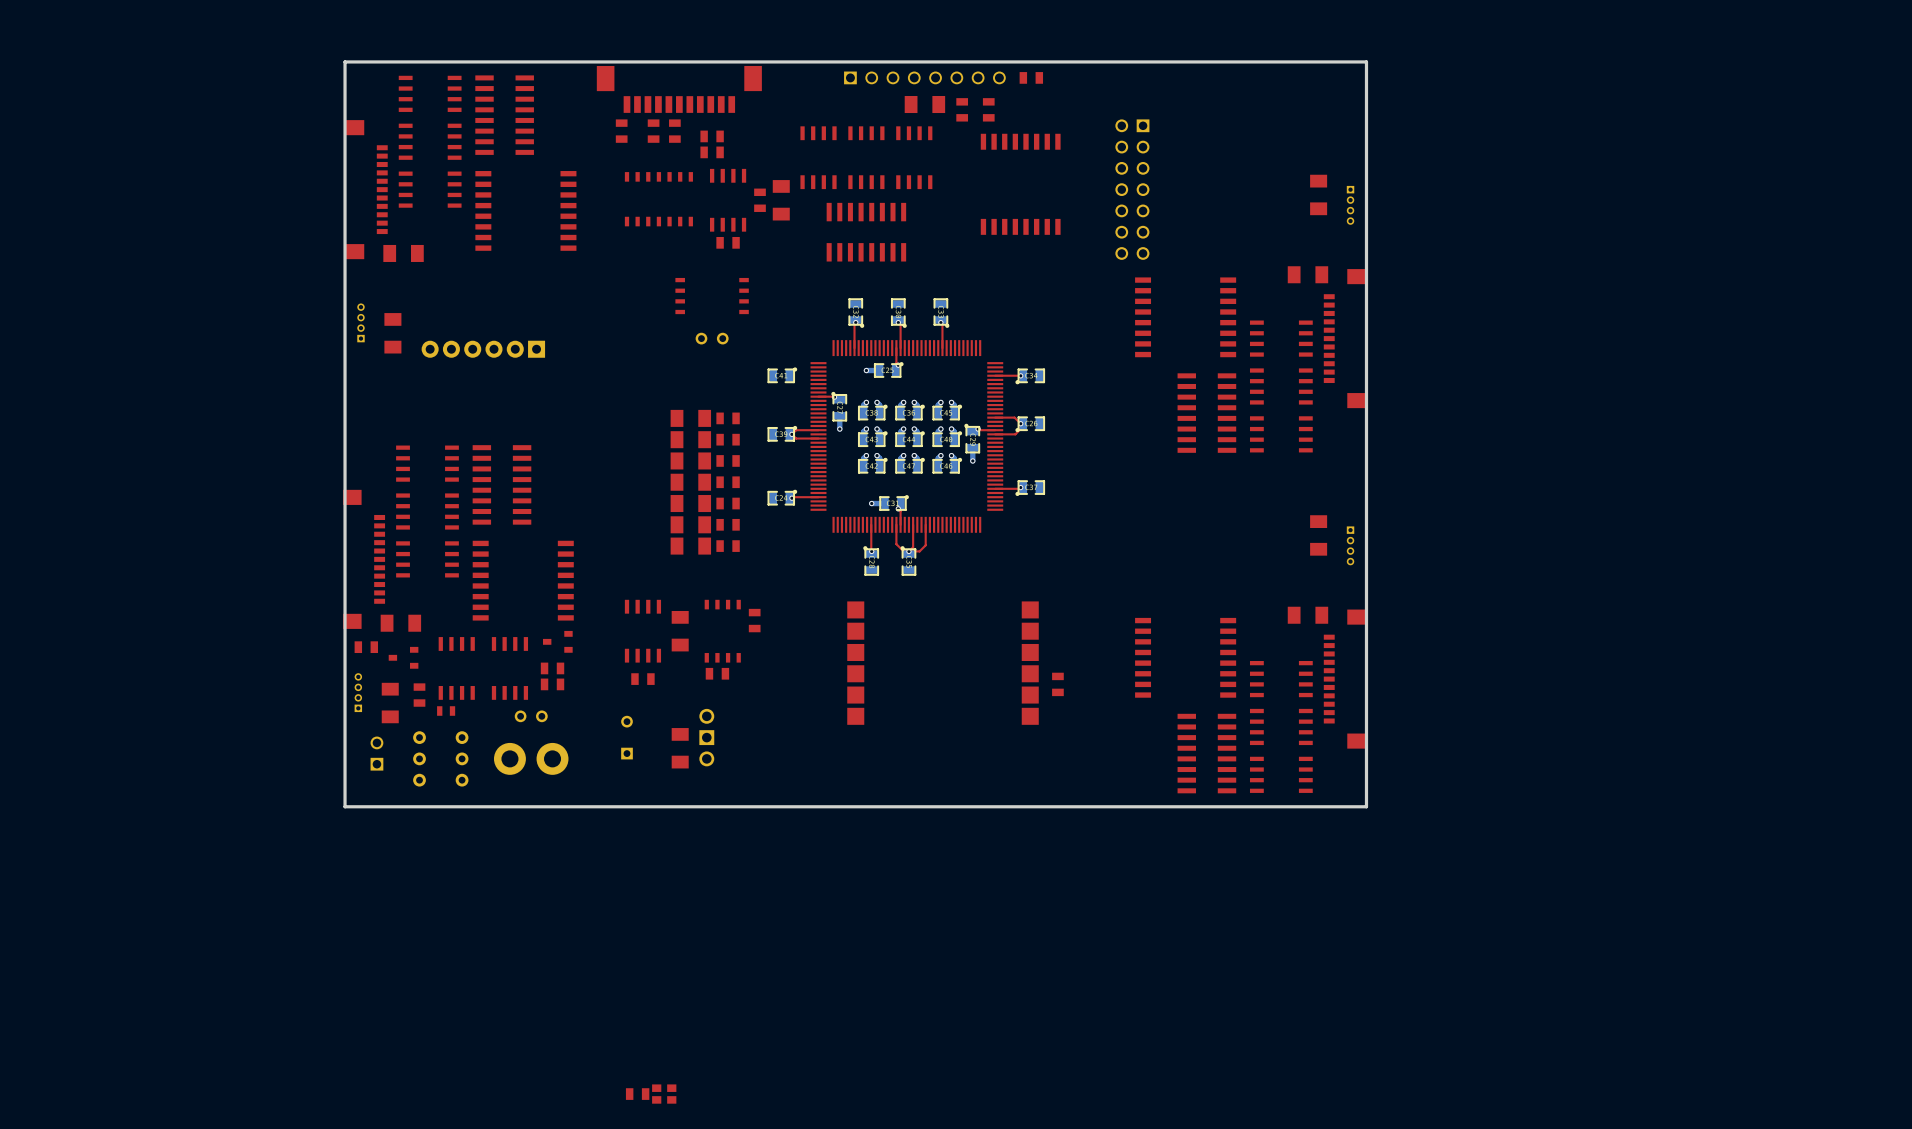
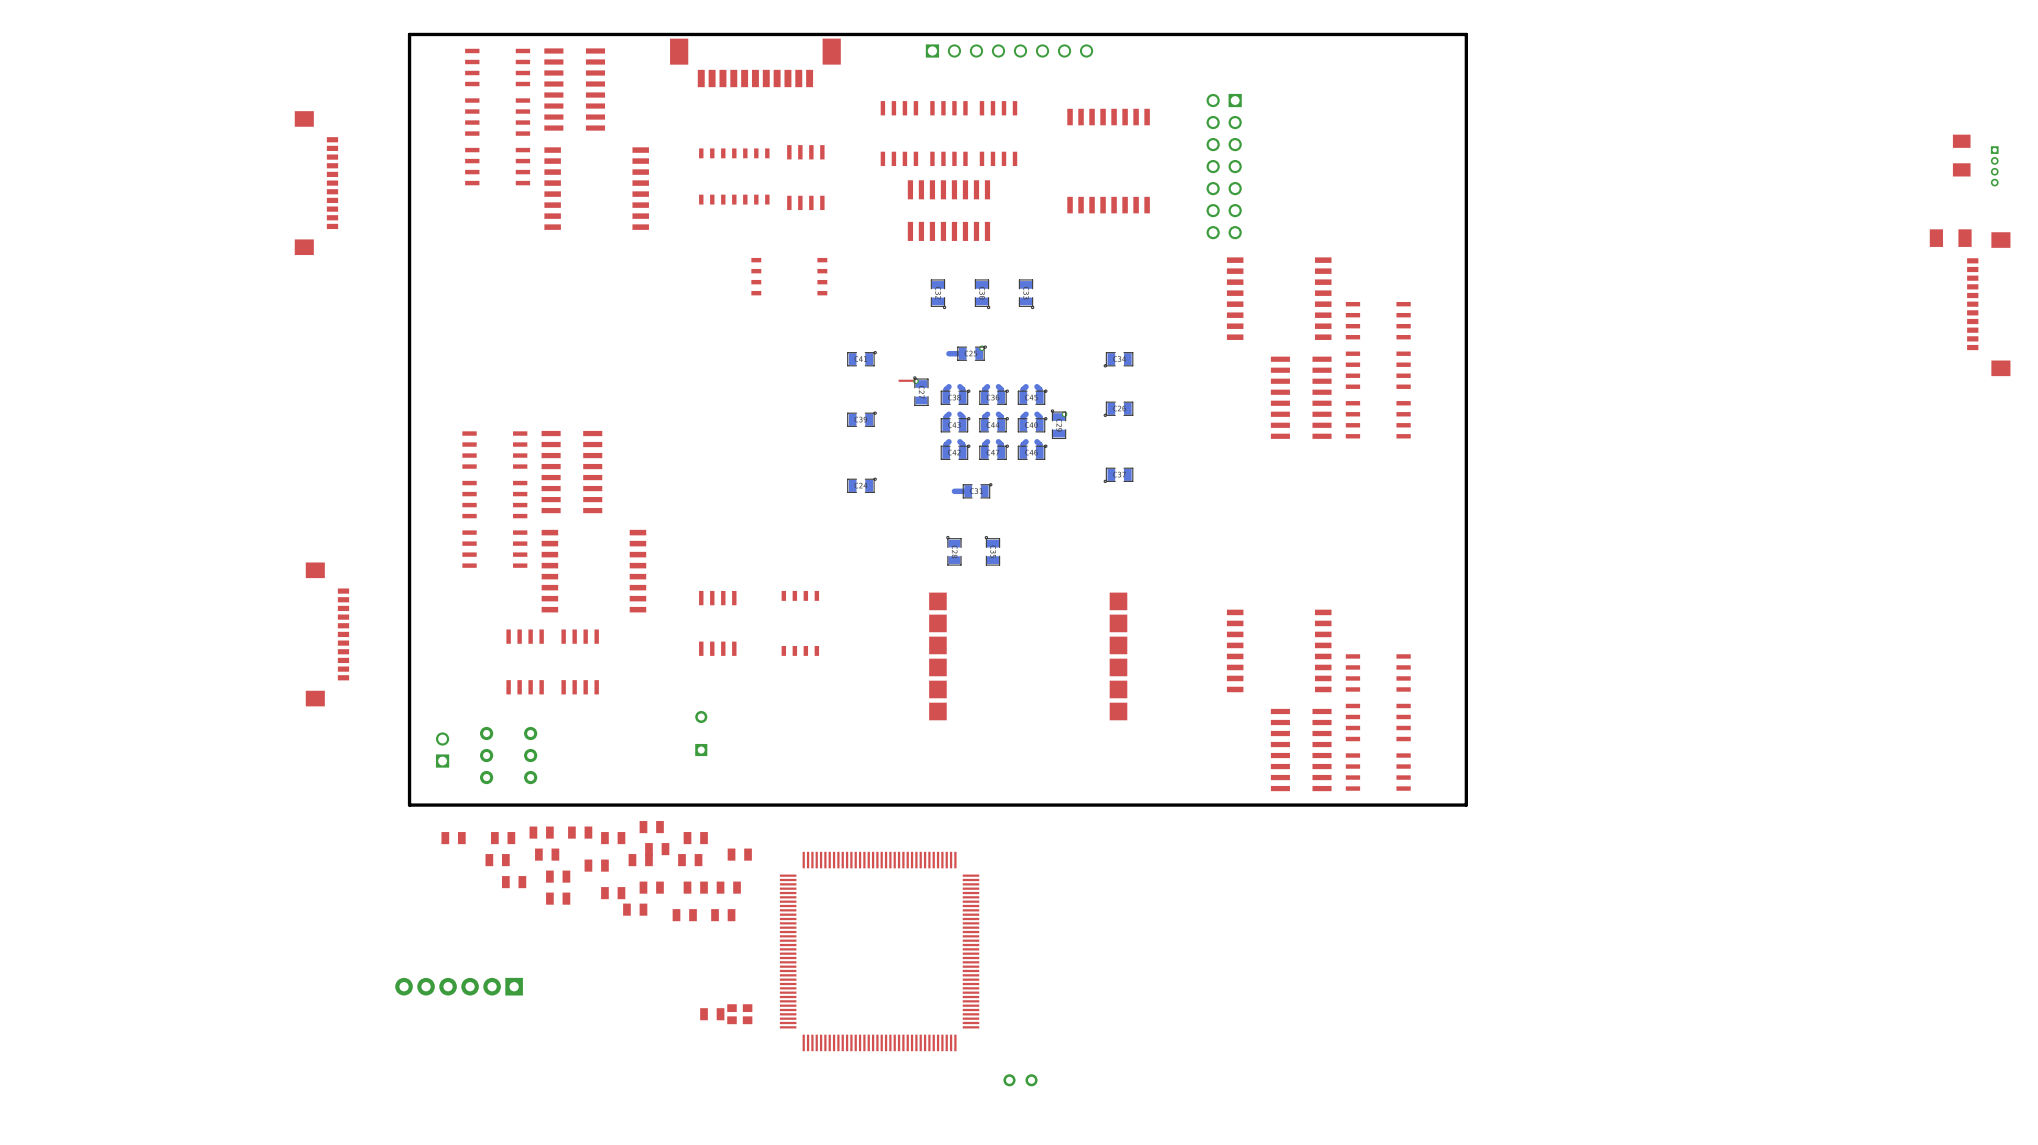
part: (1031, 77) -> none
part: (924, 104) -> none
part: (962, 109) -> none
part: (988, 109) -> none
part: (621, 131) -> none
part: (653, 131) -> none
part: (674, 131) -> none
part: (712, 136) -> none
part: (712, 152) -> none
part: none -> (1961, 155)
part position: (366, 189) -> (316, 183)
part: none -> (1994, 166)
part: (1318, 194) -> none
part: (760, 200) -> none
part: (781, 200) -> none
part: (1350, 205) -> none
part: (728, 242) -> none
part: (403, 253) -> none
part: none -> (1950, 238)
part: (1307, 274) -> none
part: (360, 322) -> none
top track: (855, 322) (854, 348) -> none
via: (855, 322) -> none
top track: (898, 322) (900, 324) (900, 348) -> none
via: (898, 322) -> none
top track: (940, 322) (942, 348) -> none
via: (940, 322) -> none
part: none -> (1988, 304)
part: (392, 333) -> none
part: (712, 338) -> none
part: (1344, 338) -> none
top track: (896, 348) (896, 363) (898, 365) -> none
part: (483, 349) -> none
via: (866, 370) -> none
top track: (1020, 375) (995, 375) -> none
via: (1020, 375) -> none
via: (866, 402) -> none
via: (877, 402) -> none
via: (903, 402) -> none
via: (914, 402) -> none
via: (940, 402) -> none
via: (951, 402) -> none
bottom track: (839, 415) (839, 429) -> none
top track: (995, 417) (1014, 417) (1020, 423) (1020, 429) (1015, 434) (995, 434) -> none
part: (690, 418) -> none
part: (728, 418) -> none
via: (1020, 423) -> none
via: (839, 429) -> none
via: (866, 429) -> none
via: (877, 429) -> none
via: (903, 429) -> none
via: (914, 429) -> none
via: (940, 429) -> none
via: (951, 429) -> none
top track: (978, 429) (995, 430) -> none
top track: (818, 430) (796, 430) (791, 434) (796, 438) (818, 438) -> none
via: (791, 434) -> none
part: (906, 436) -> none
part: (690, 439) -> none
part: (728, 439) -> none
bottom track: (972, 447) (972, 460) -> none
via: (866, 455) -> none
via: (877, 455) -> none
via: (903, 455) -> none
via: (914, 455) -> none
via: (940, 455) -> none
via: (951, 455) -> none
part: (690, 460) -> none
part: (728, 460) -> none
via: (972, 460) -> none
part: (690, 482) -> none
part: (728, 482) -> none
top track: (1020, 487) (995, 488) -> none
via: (1020, 487) -> none
top track: (818, 497) (791, 498) -> none
via: (791, 498) -> none
part: (690, 503) -> none
part: (728, 503) -> none
via: (871, 503) -> none
top track: (898, 508) (900, 511) (900, 524) -> none
via: (898, 508) -> none
part: (690, 524) -> none
part: (728, 524) -> none
top track: (871, 524) (871, 551) -> none
top track: (913, 524) (913, 547) (908, 551) -> none
top track: (925, 524) (925, 545) (919, 551) (903, 551) (896, 544) (896, 524) -> none
part: (1318, 535) -> none
part: (1350, 545) -> none
part: (690, 546) -> none
part: (728, 546) -> none
via: (871, 551) -> none
via: (908, 551) -> none
part position: (364, 559) -> (327, 634)
part: (1307, 615) -> none
part: (754, 620) -> none
part: (400, 623) -> none
part: (680, 631) -> none
part: (557, 641) -> none
part: (366, 647) -> none
part: (403, 657) -> none
part: (552, 668) -> none
part: (717, 673) -> none
part: (642, 679) -> none
part: (1344, 679) -> none
part: (552, 684) -> none
part: (1057, 684) -> none
part: (358, 692) -> none
part: (419, 695) -> none
part: (390, 703) -> none
part: (446, 711) -> none
part: (531, 716) -> none
part: (706, 737) -> none
part: (680, 748) -> none
part: (531, 758) -> none
part: none -> (651, 827)
part: none -> (541, 832)
part: none -> (580, 832)
part: none -> (453, 838)
part: none -> (503, 838)
part: none -> (613, 838)
part: none -> (695, 838)
part: none -> (657, 849)
part: none -> (547, 854)
part: none -> (739, 854)
part: none -> (497, 860)
part: none -> (640, 860)
part: none -> (690, 860)
part: none -> (596, 865)
part: none -> (558, 876)
part: none -> (514, 882)
part: none -> (651, 887)
part: none -> (695, 887)
part: none -> (728, 887)
part: none -> (613, 893)
part: none -> (558, 898)
part: none -> (635, 909)
part: none -> (684, 915)
part: none -> (723, 915)
part: none -> (879, 951)
part: none -> (459, 986)
part: none -> (1020, 1080)
part position: (637, 1094) -> (712, 1014)
part position: (664, 1094) -> (739, 1014)

